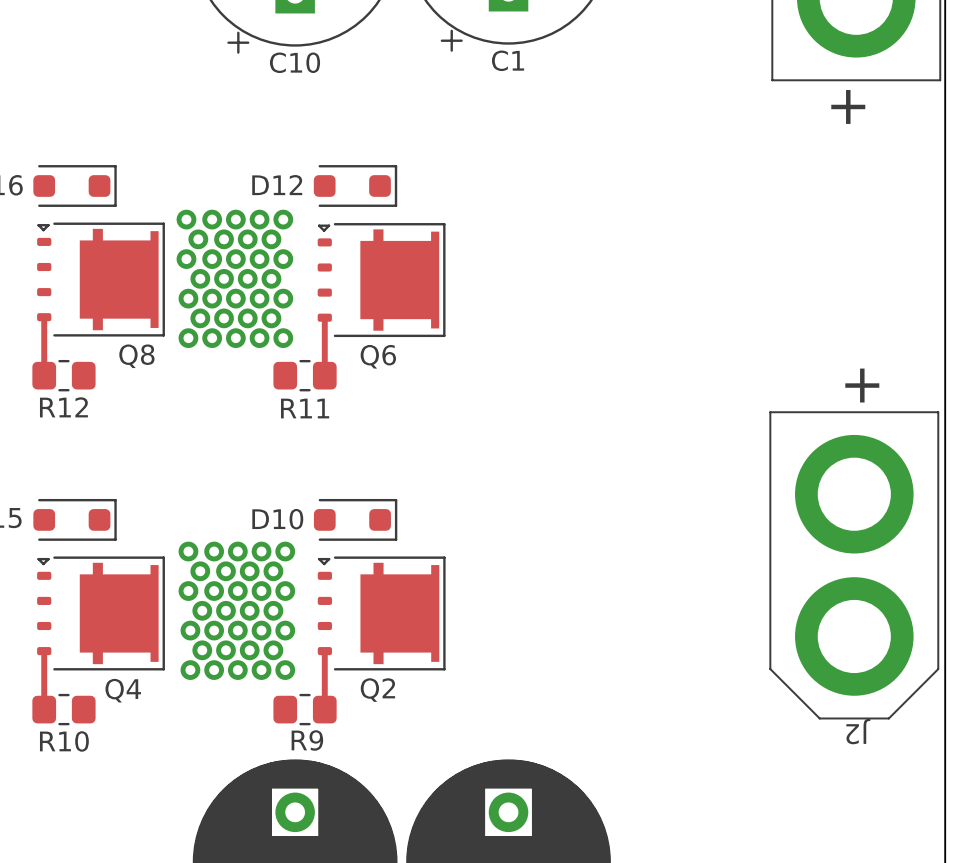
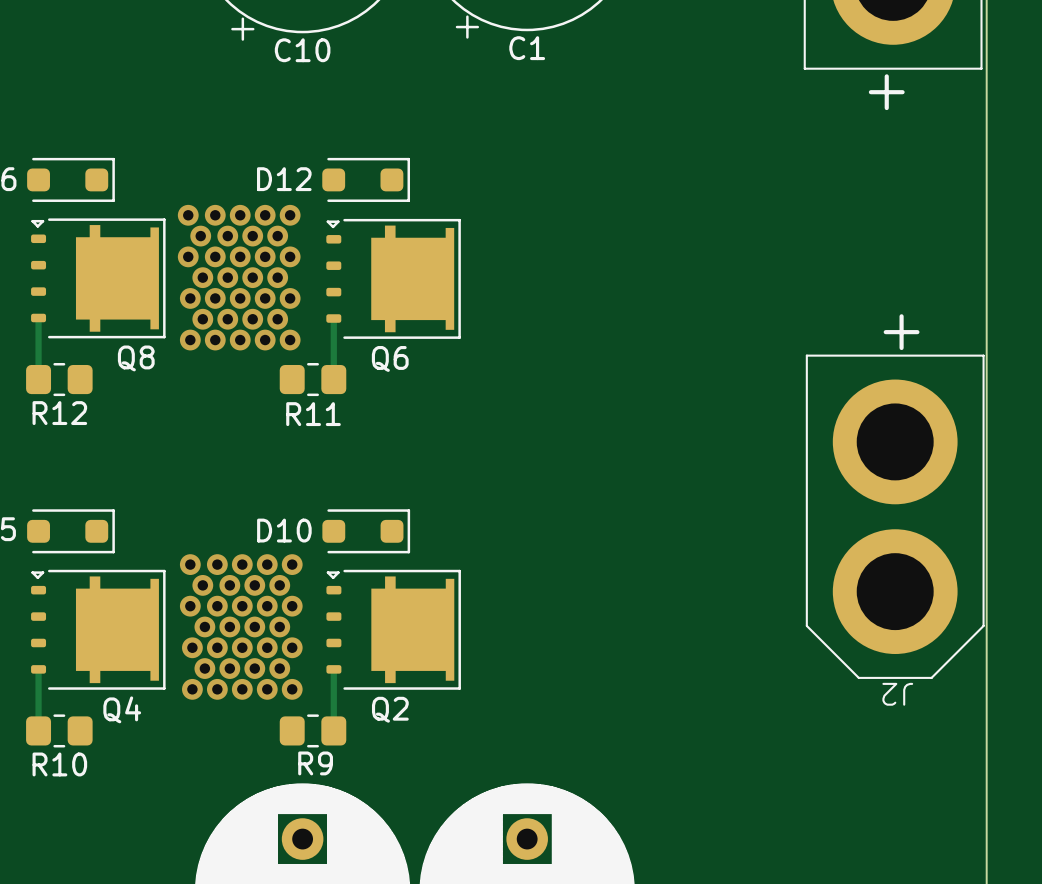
J2 position: (854, 565) -> (895, 516)

